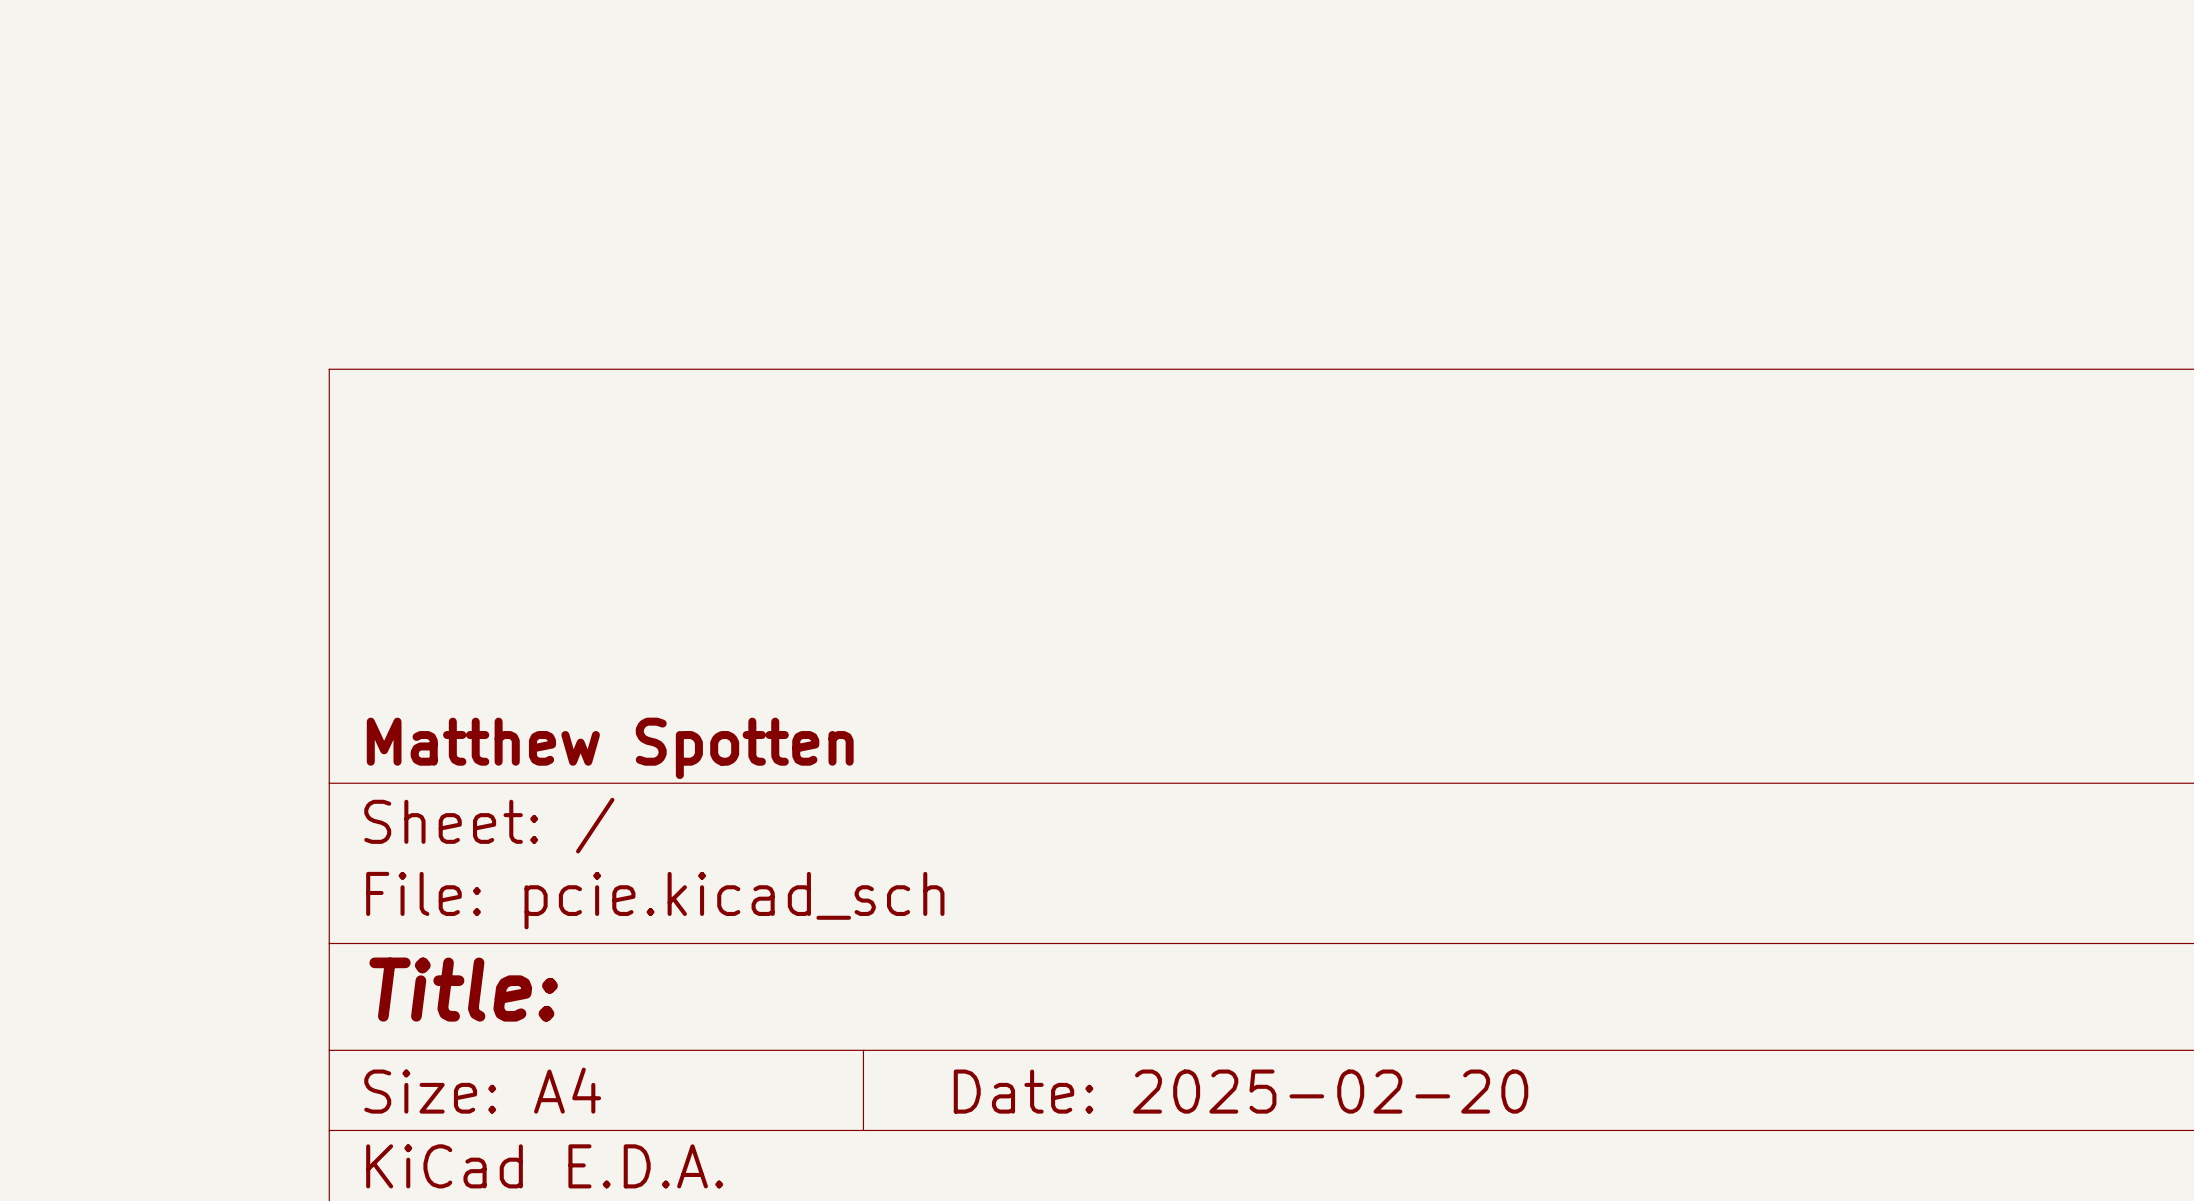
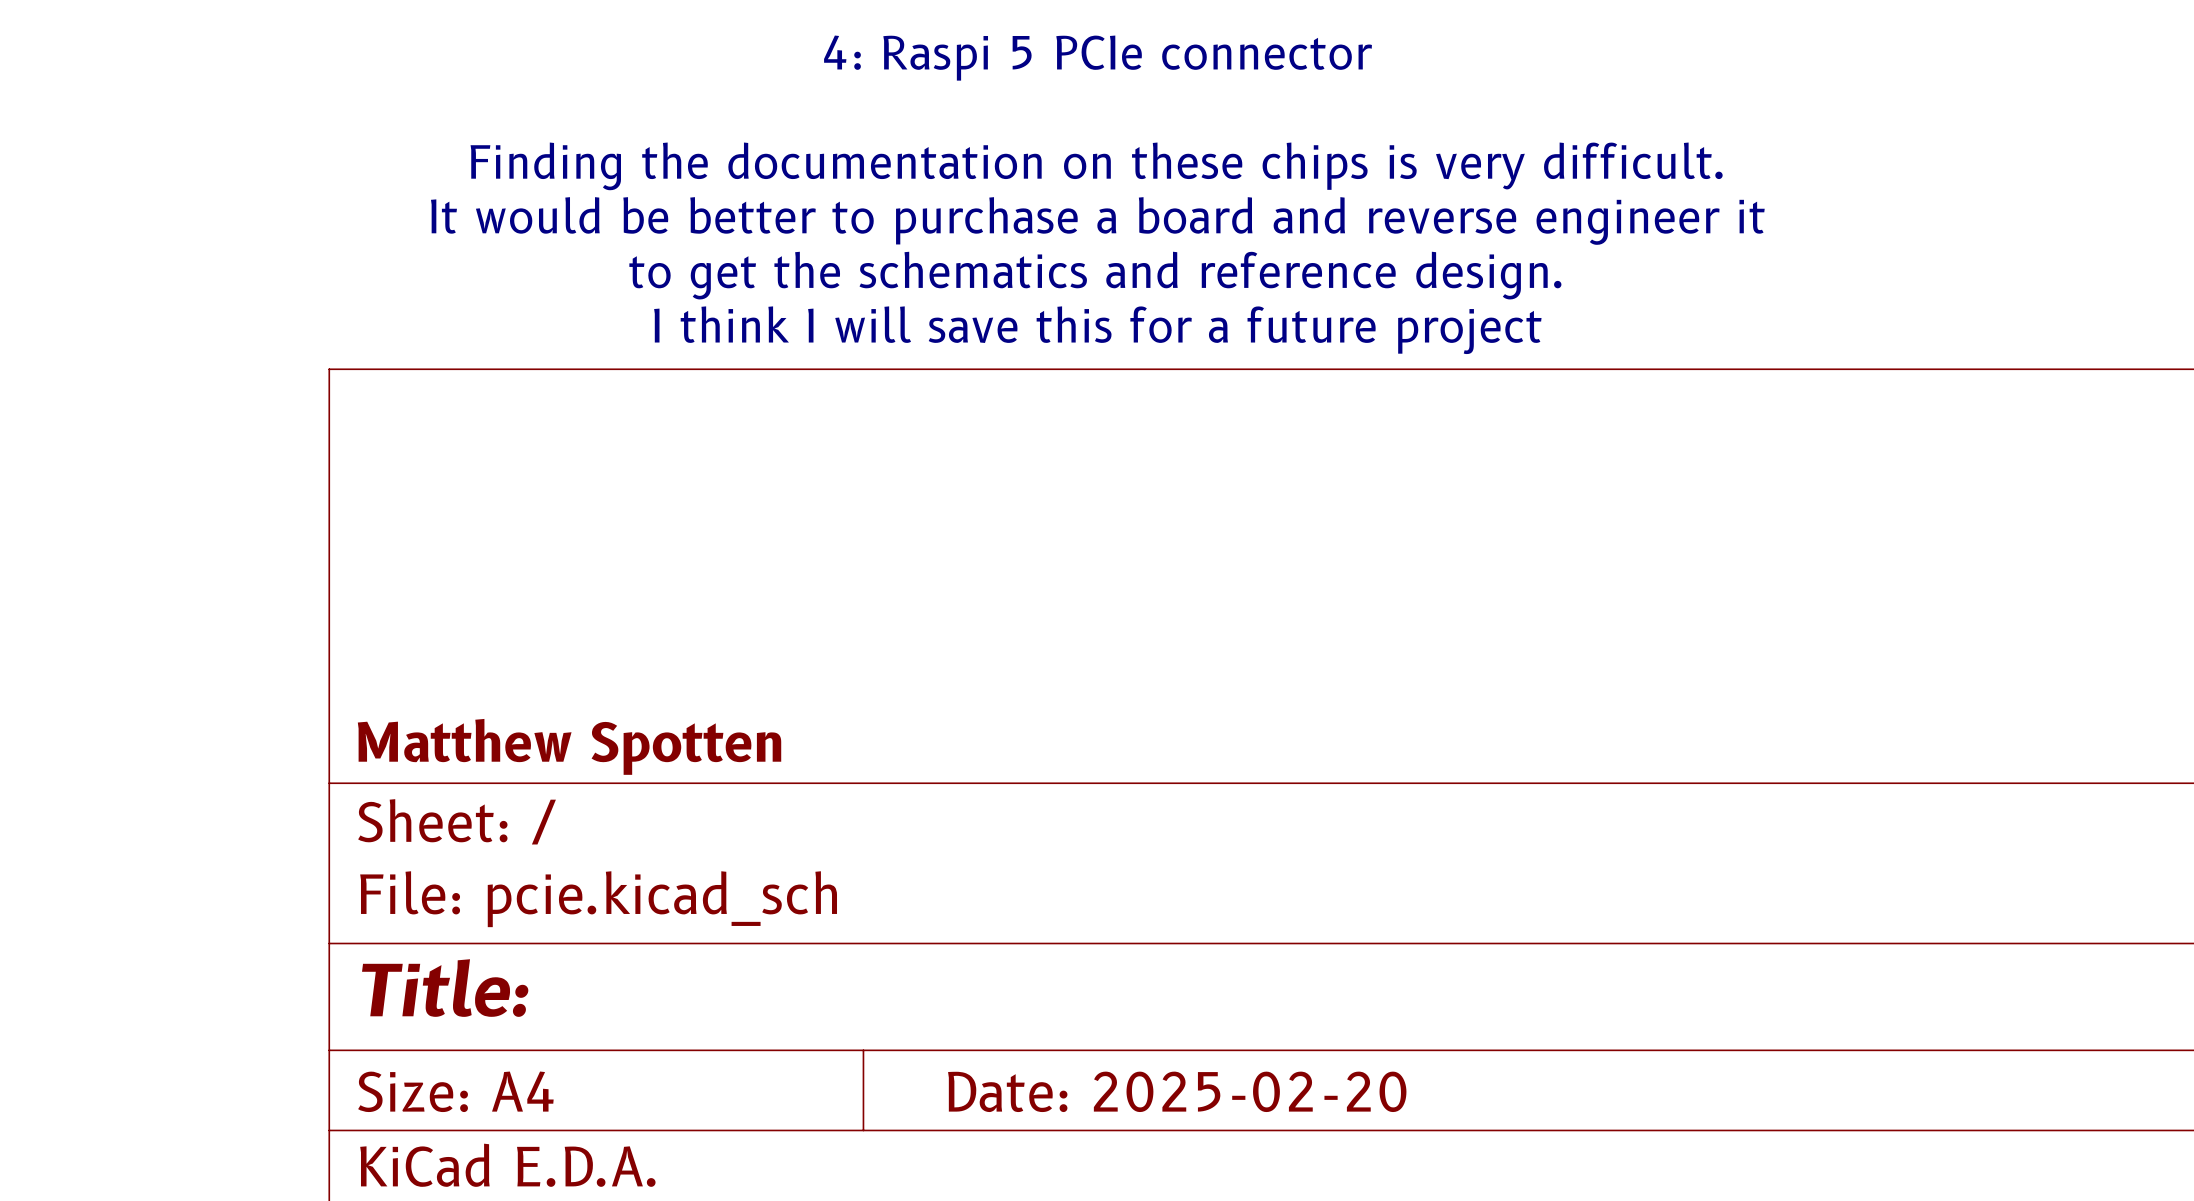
text: none -> 4: Raspi 5 PCIe connector (1098, 58)
text: none -> Finding the documentation on these chips is very difficult. (1096, 166)
text: none -> It would be better to purchase a board and reverse engineer it (1097, 220)
text: none -> to get the schematics and reference design. (1095, 275)
text: none -> I think I will save this for a future project (1097, 330)

